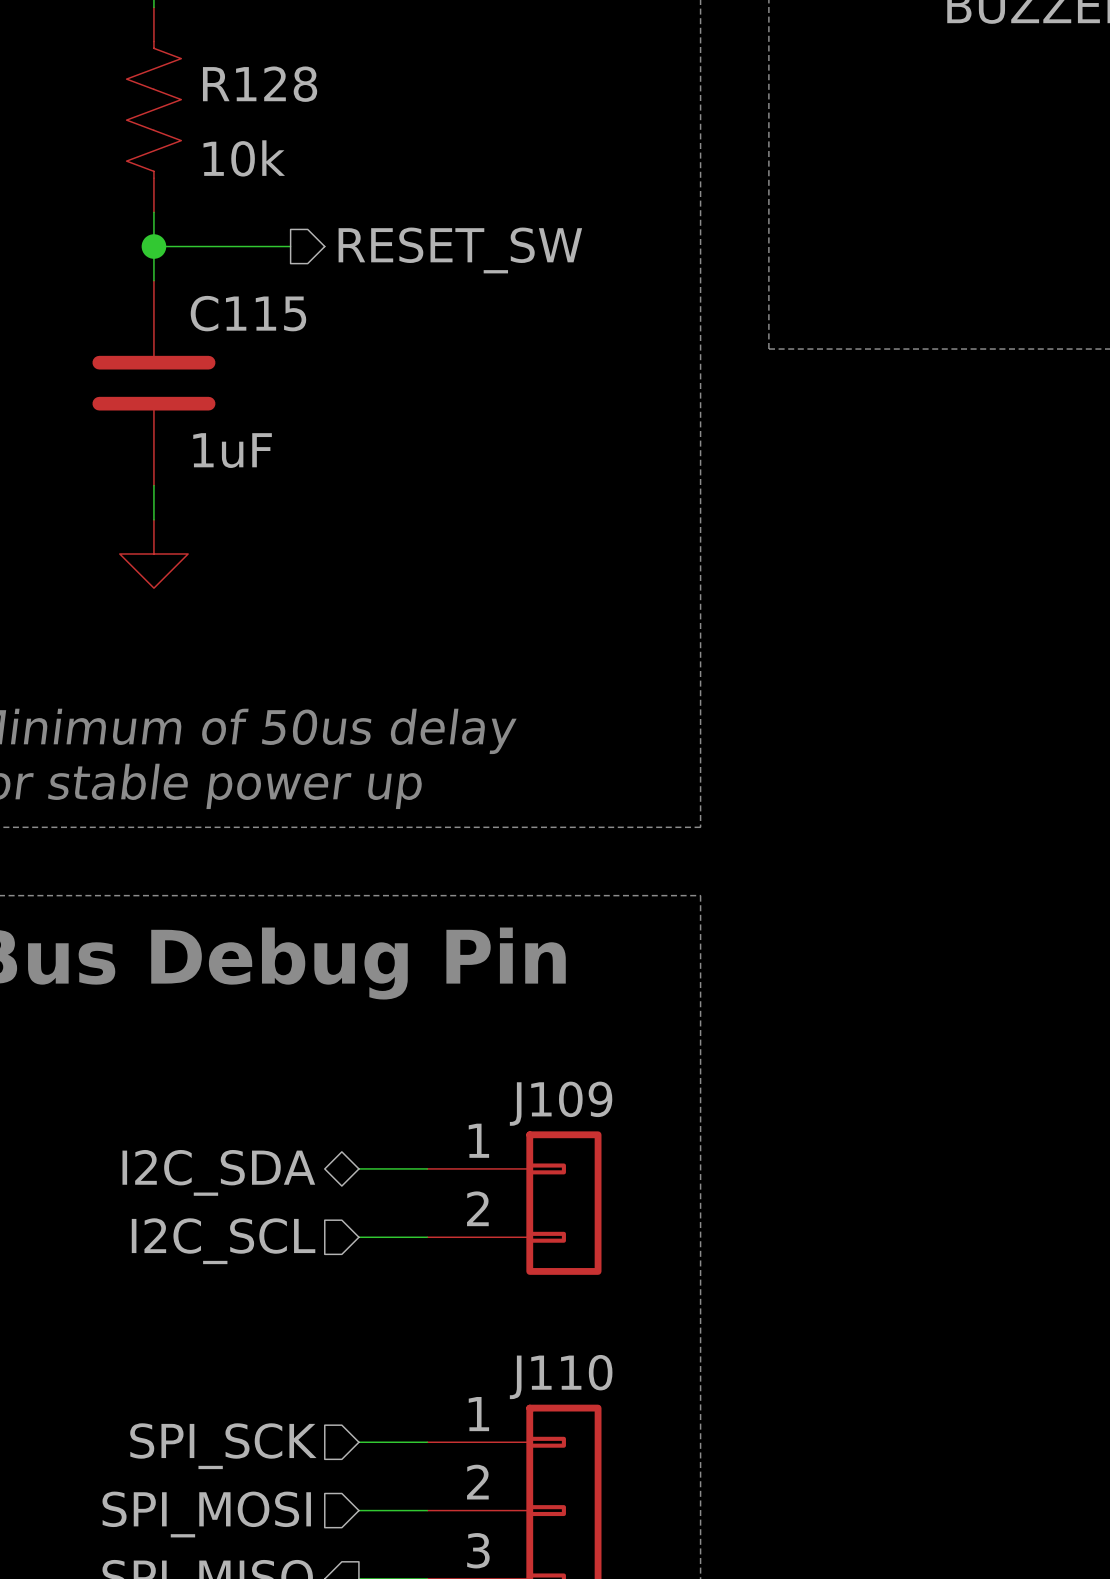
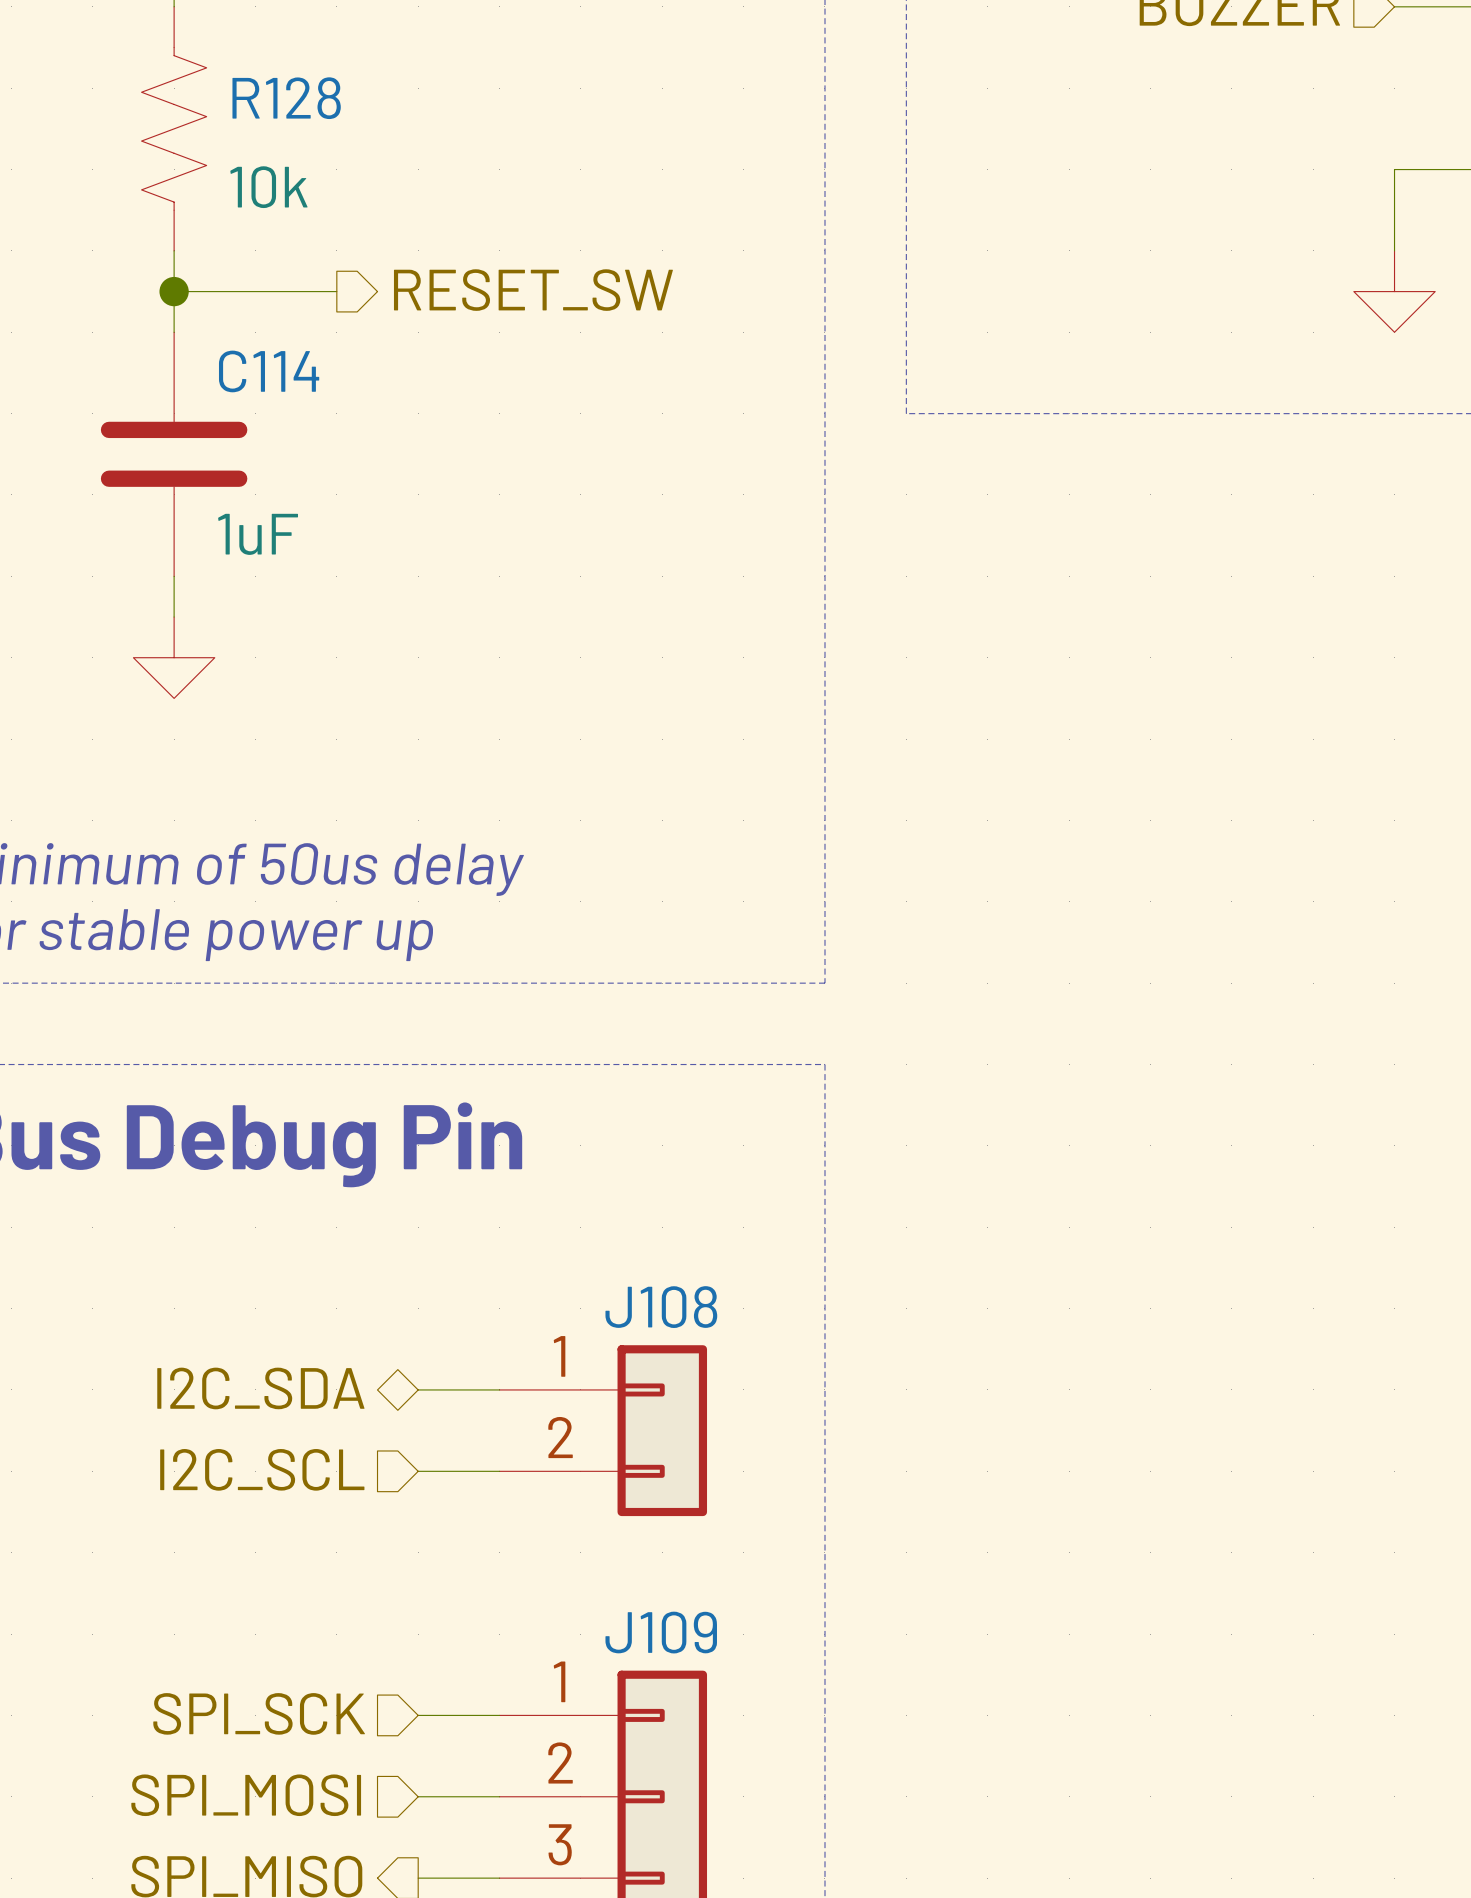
C115 name: C115 (248, 313) -> C114 (269, 371)
J109 name: J109 (561, 1103) -> J108 (661, 1307)
J110 name: J110 (561, 1377) -> J109 (661, 1632)

